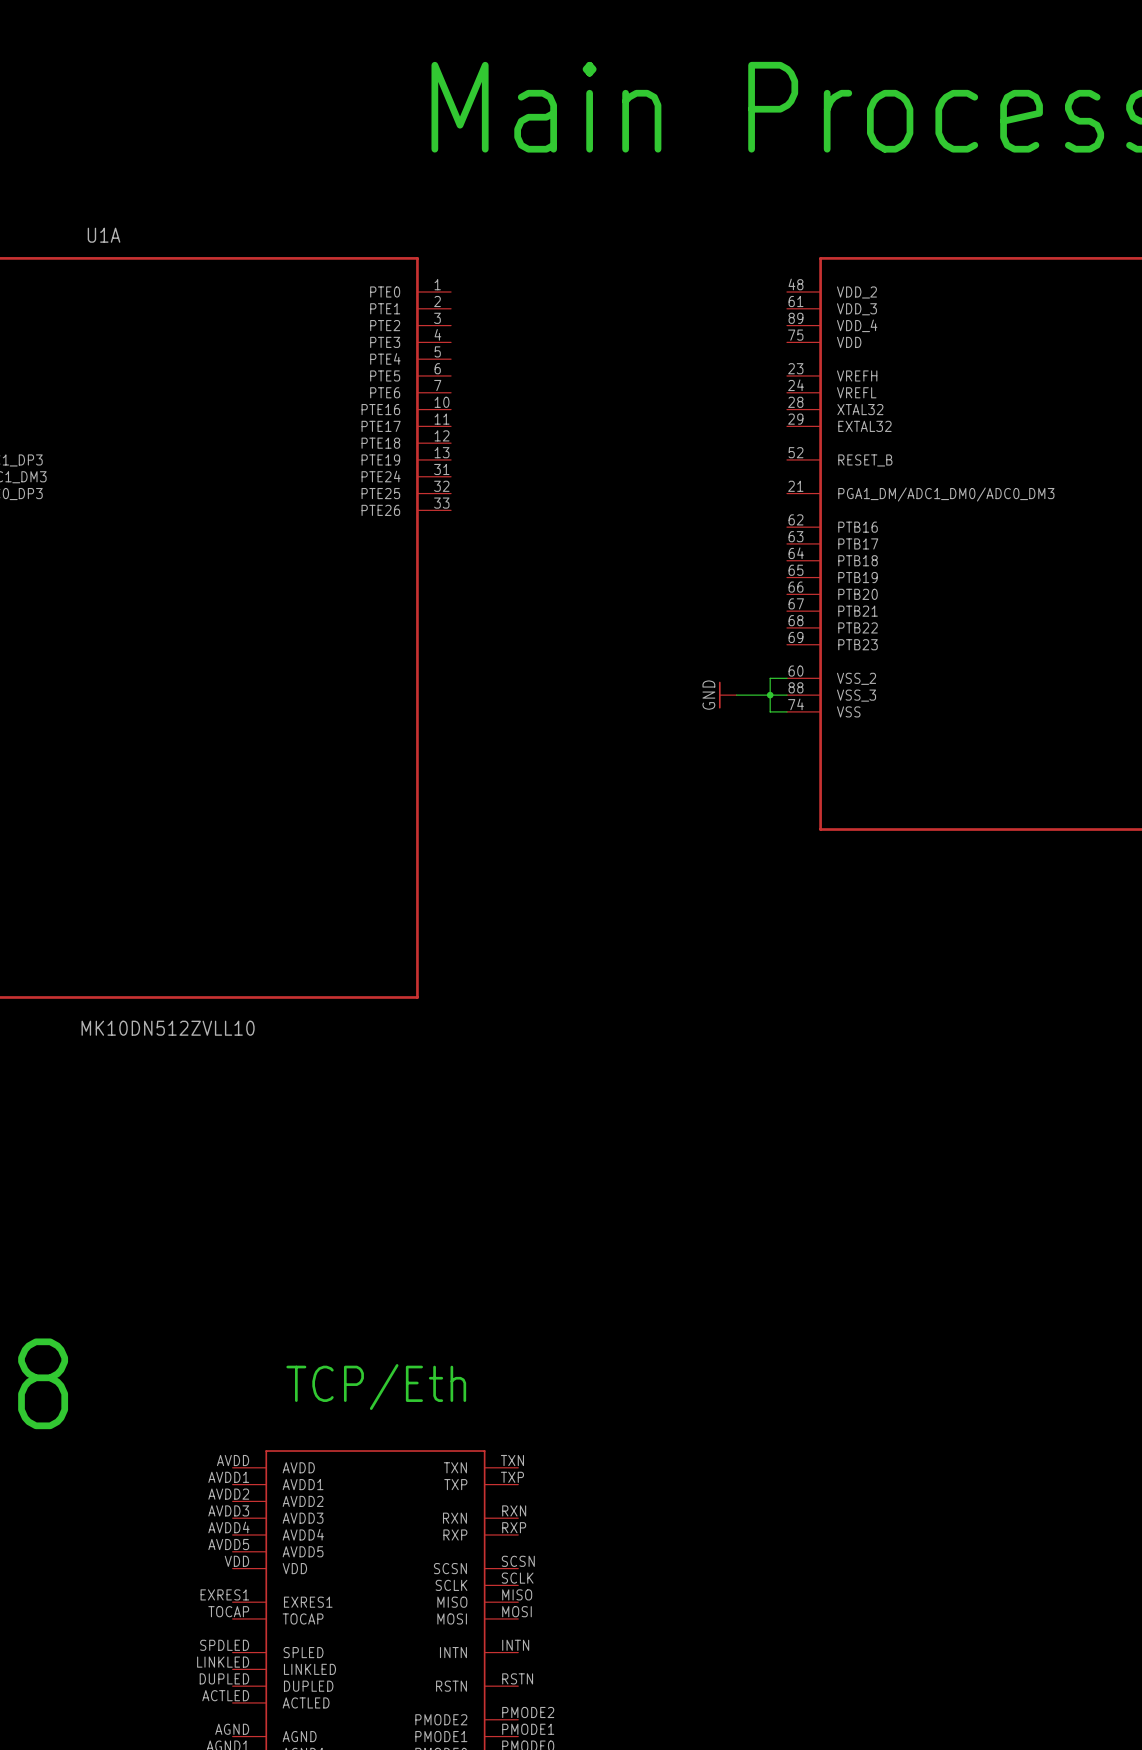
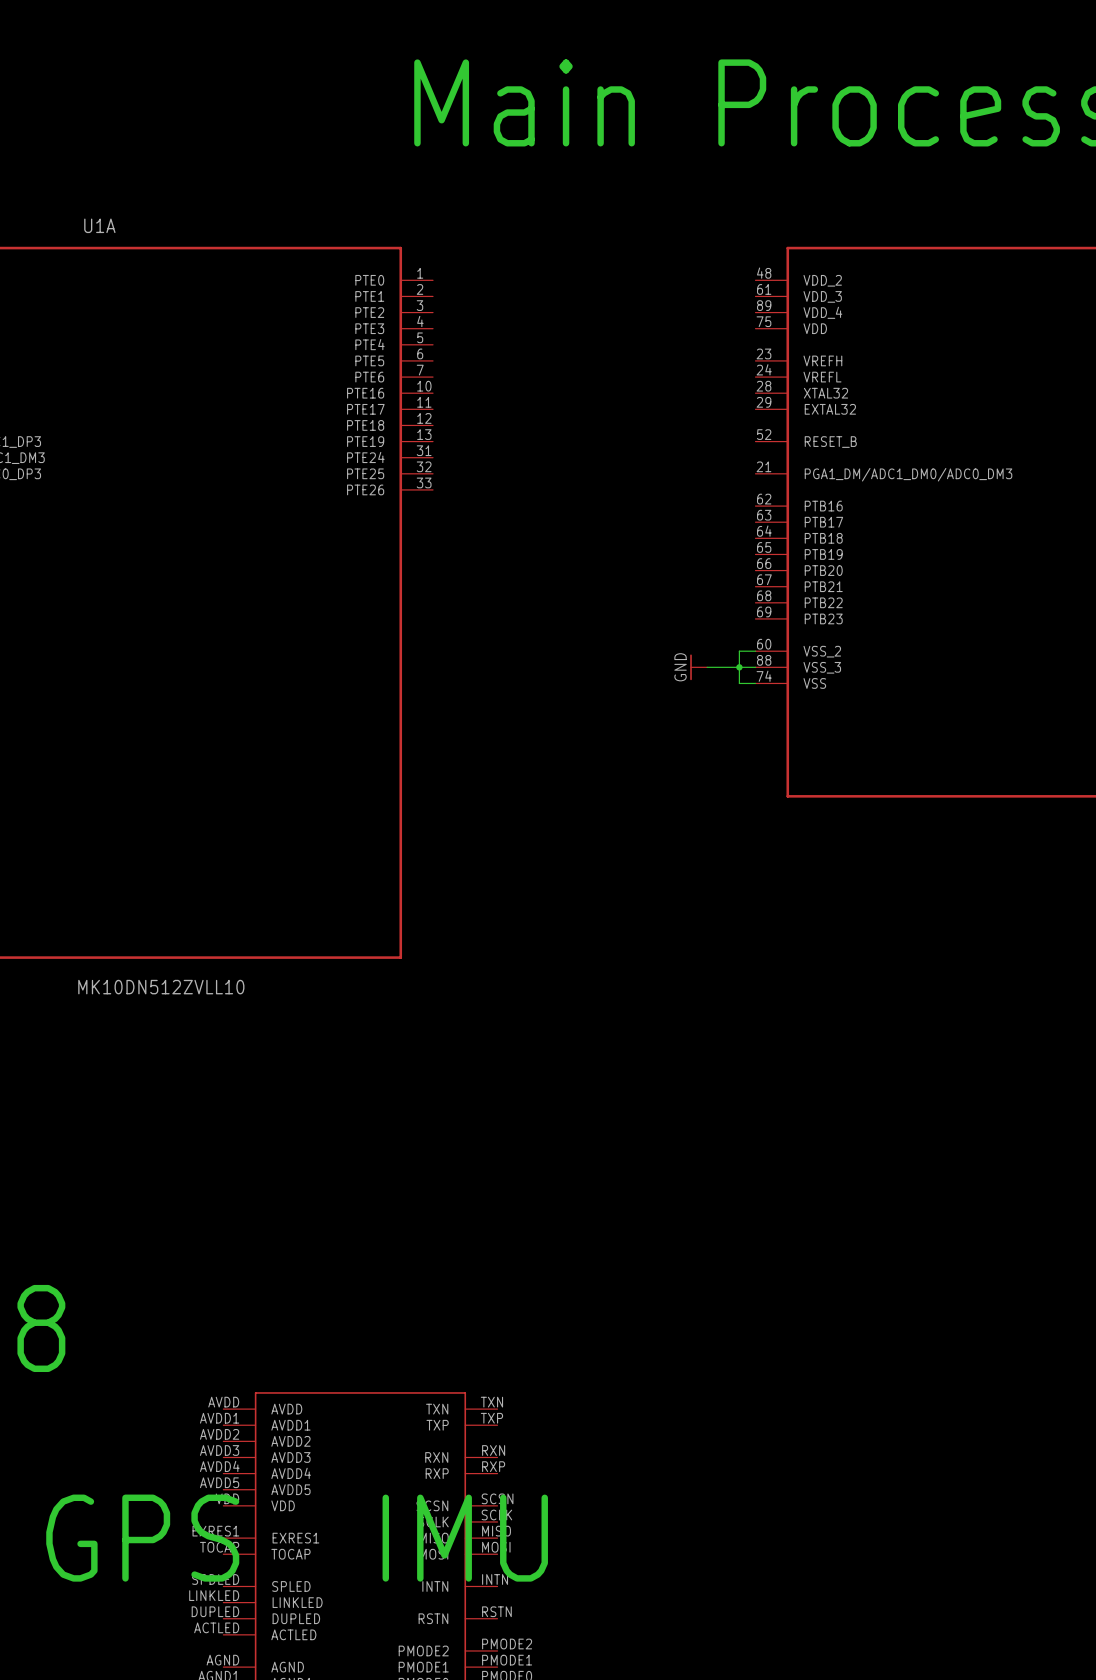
text: TCP/Eth (376, 1387) -> none
text: none -> GPS (142, 1538)
text: none -> IMU (465, 1538)

